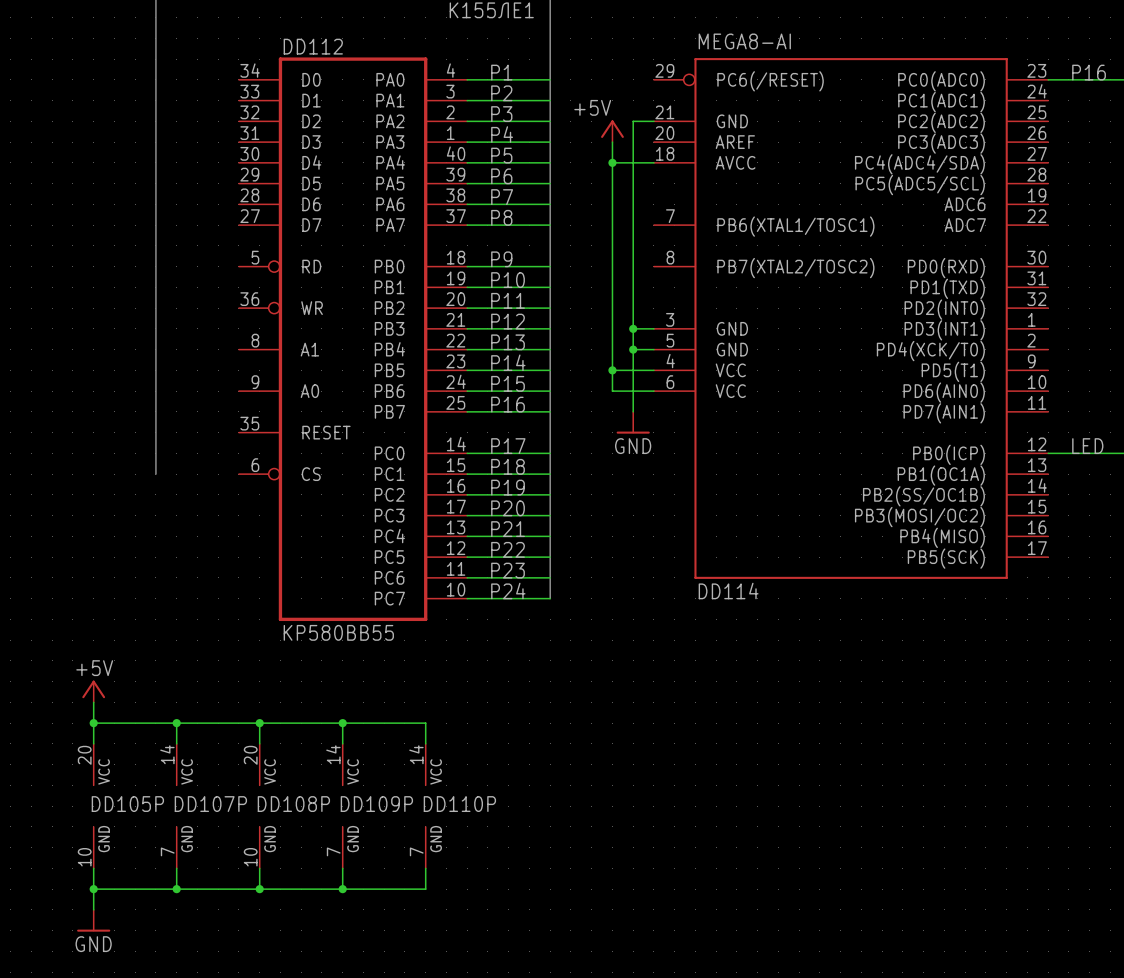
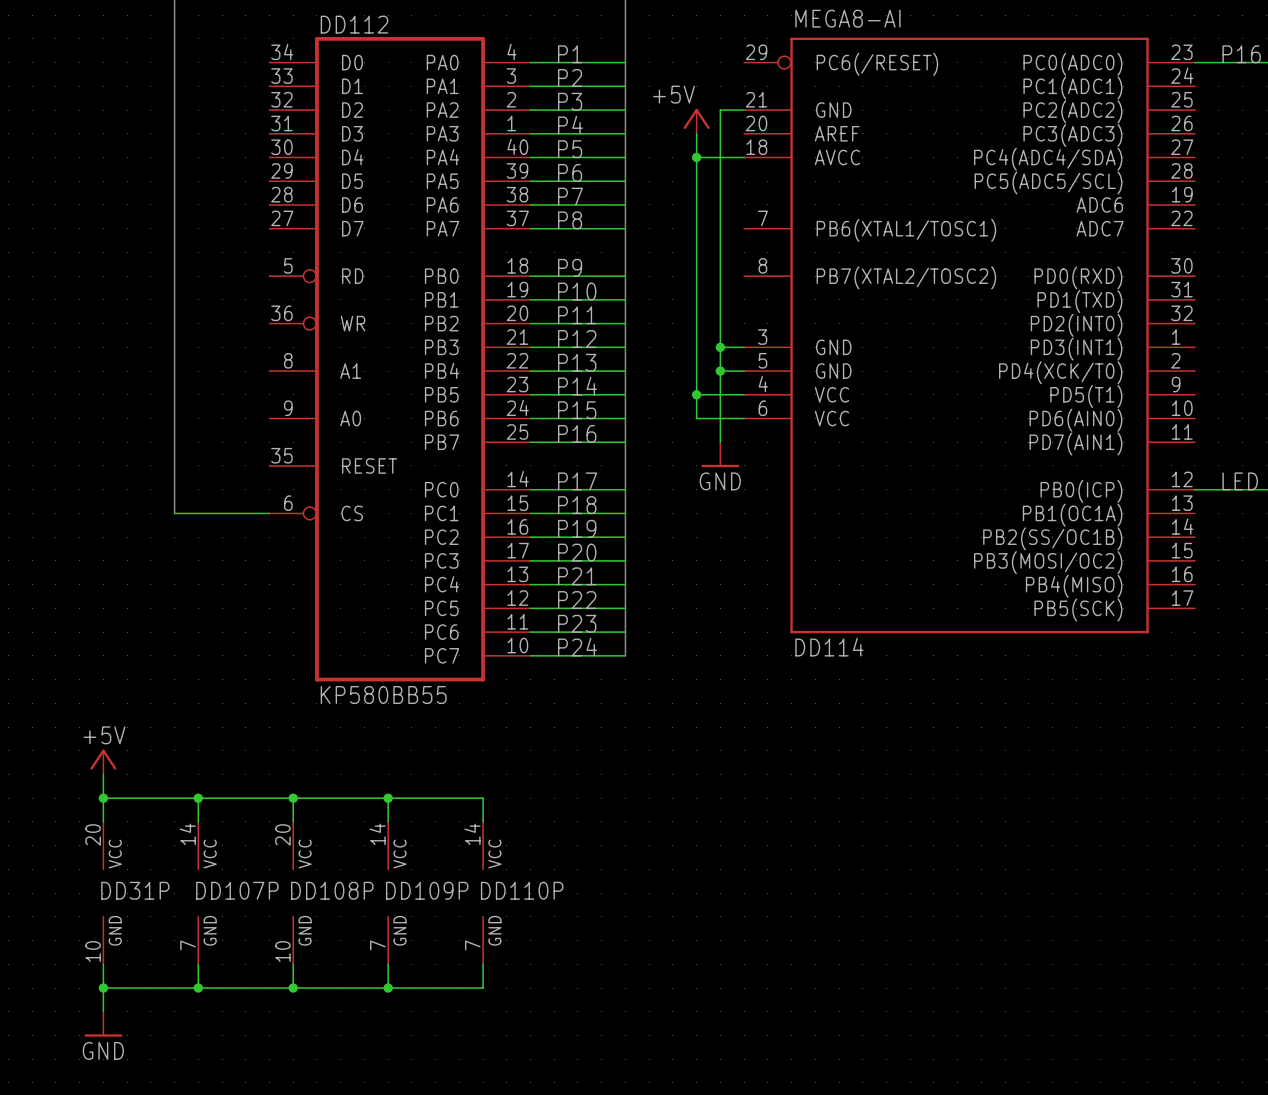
wire: none -> (174, 513) (269, 513)
DD105P name: DD105P (127, 804) -> DD31P (135, 890)

